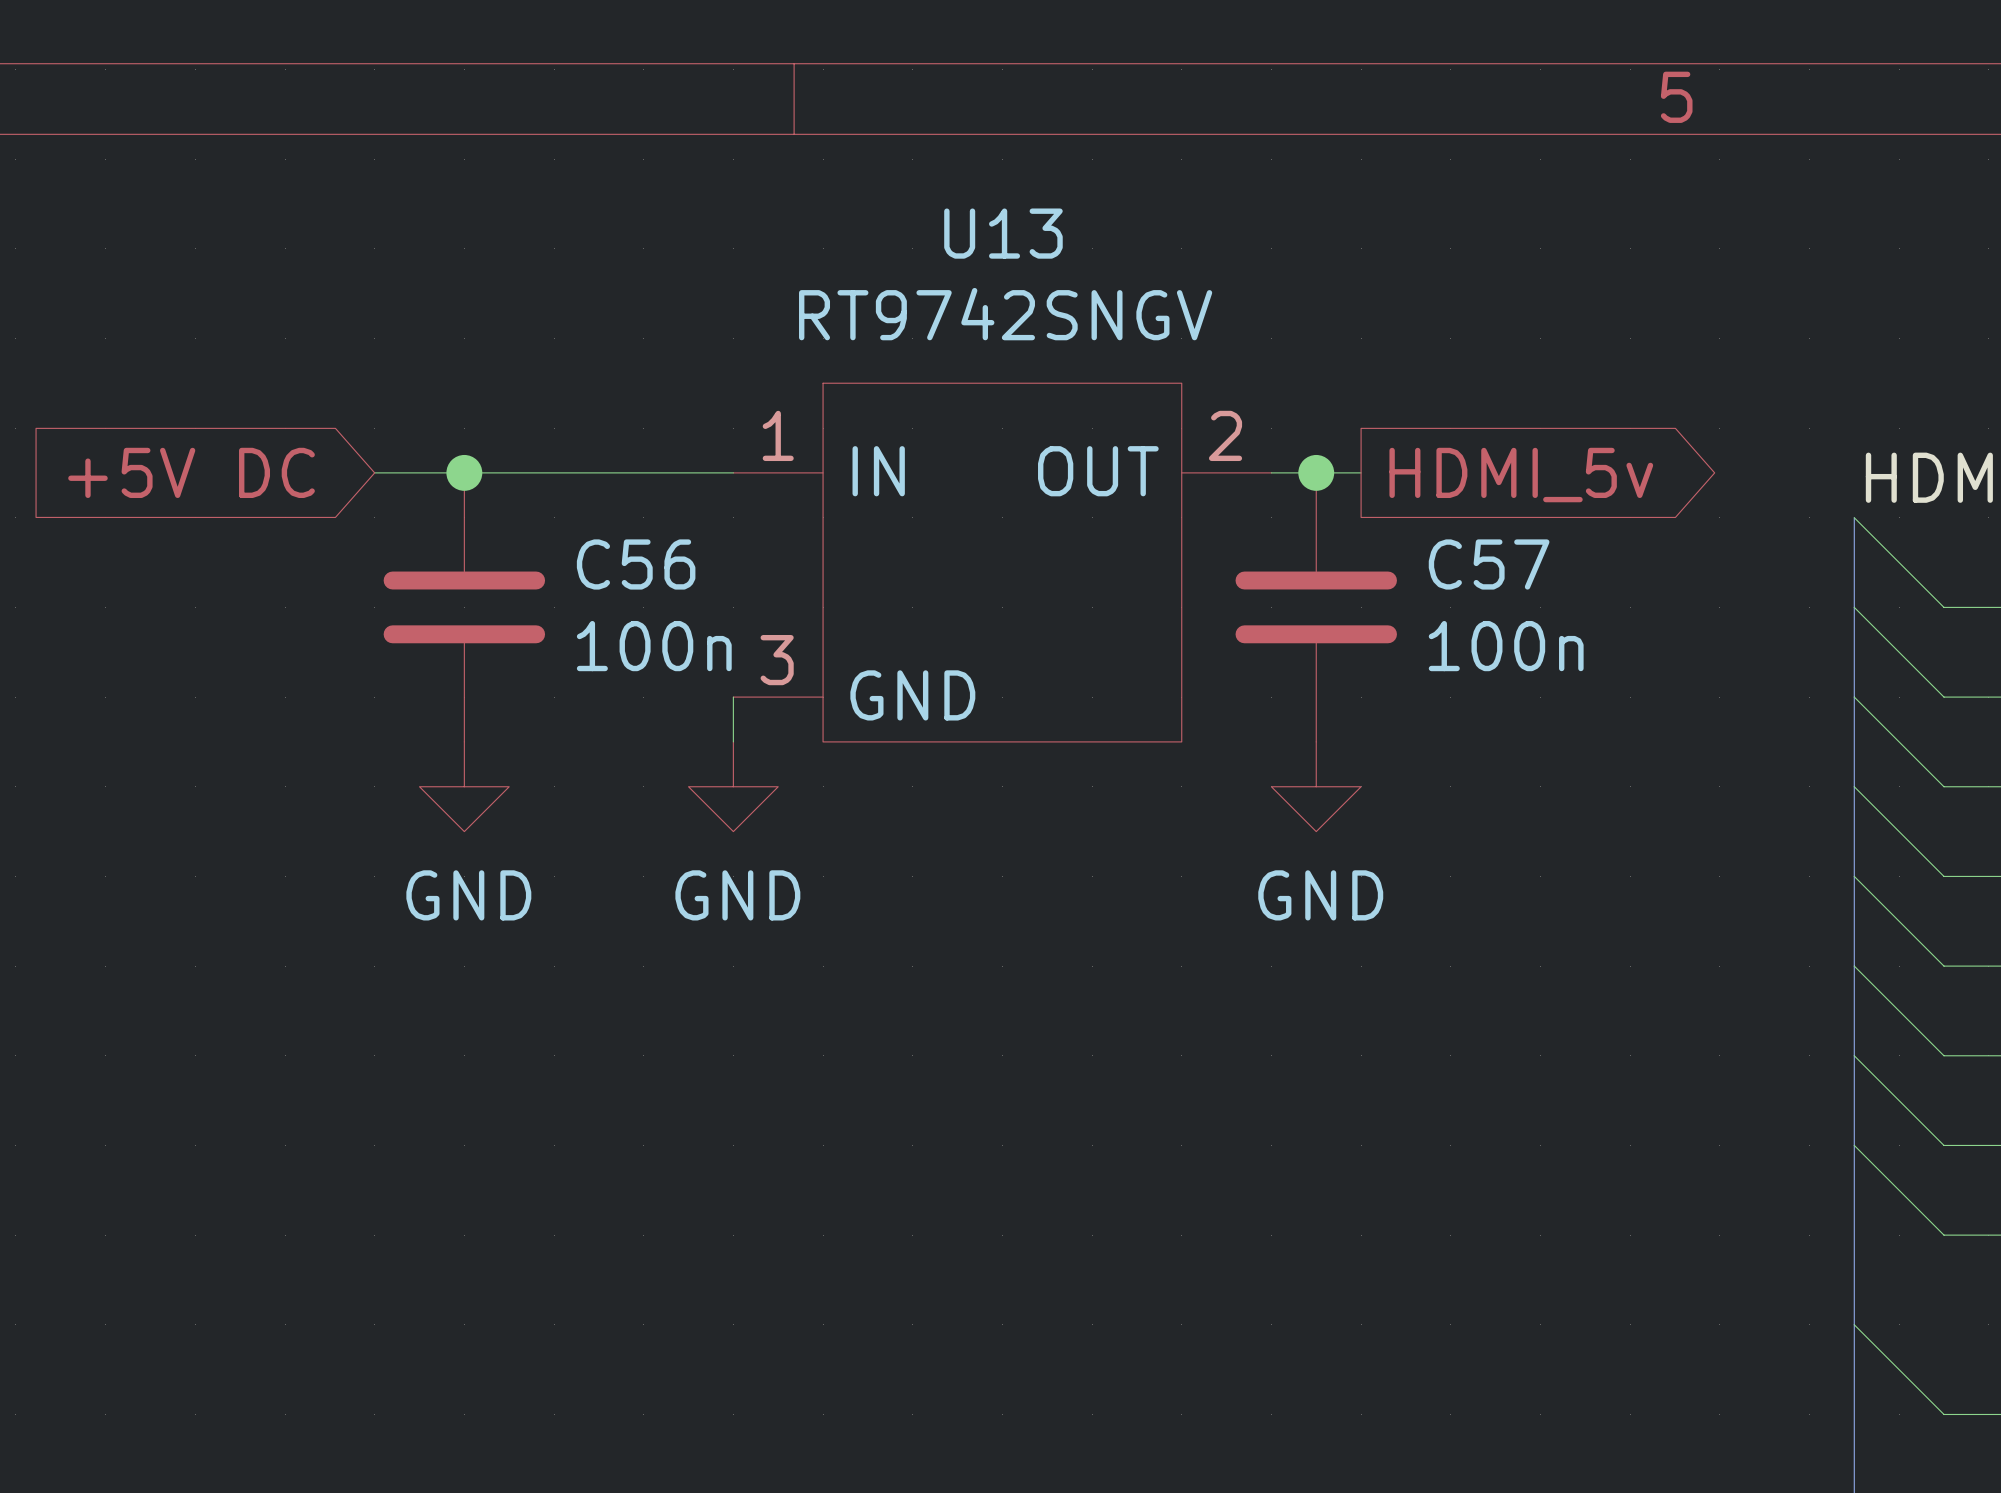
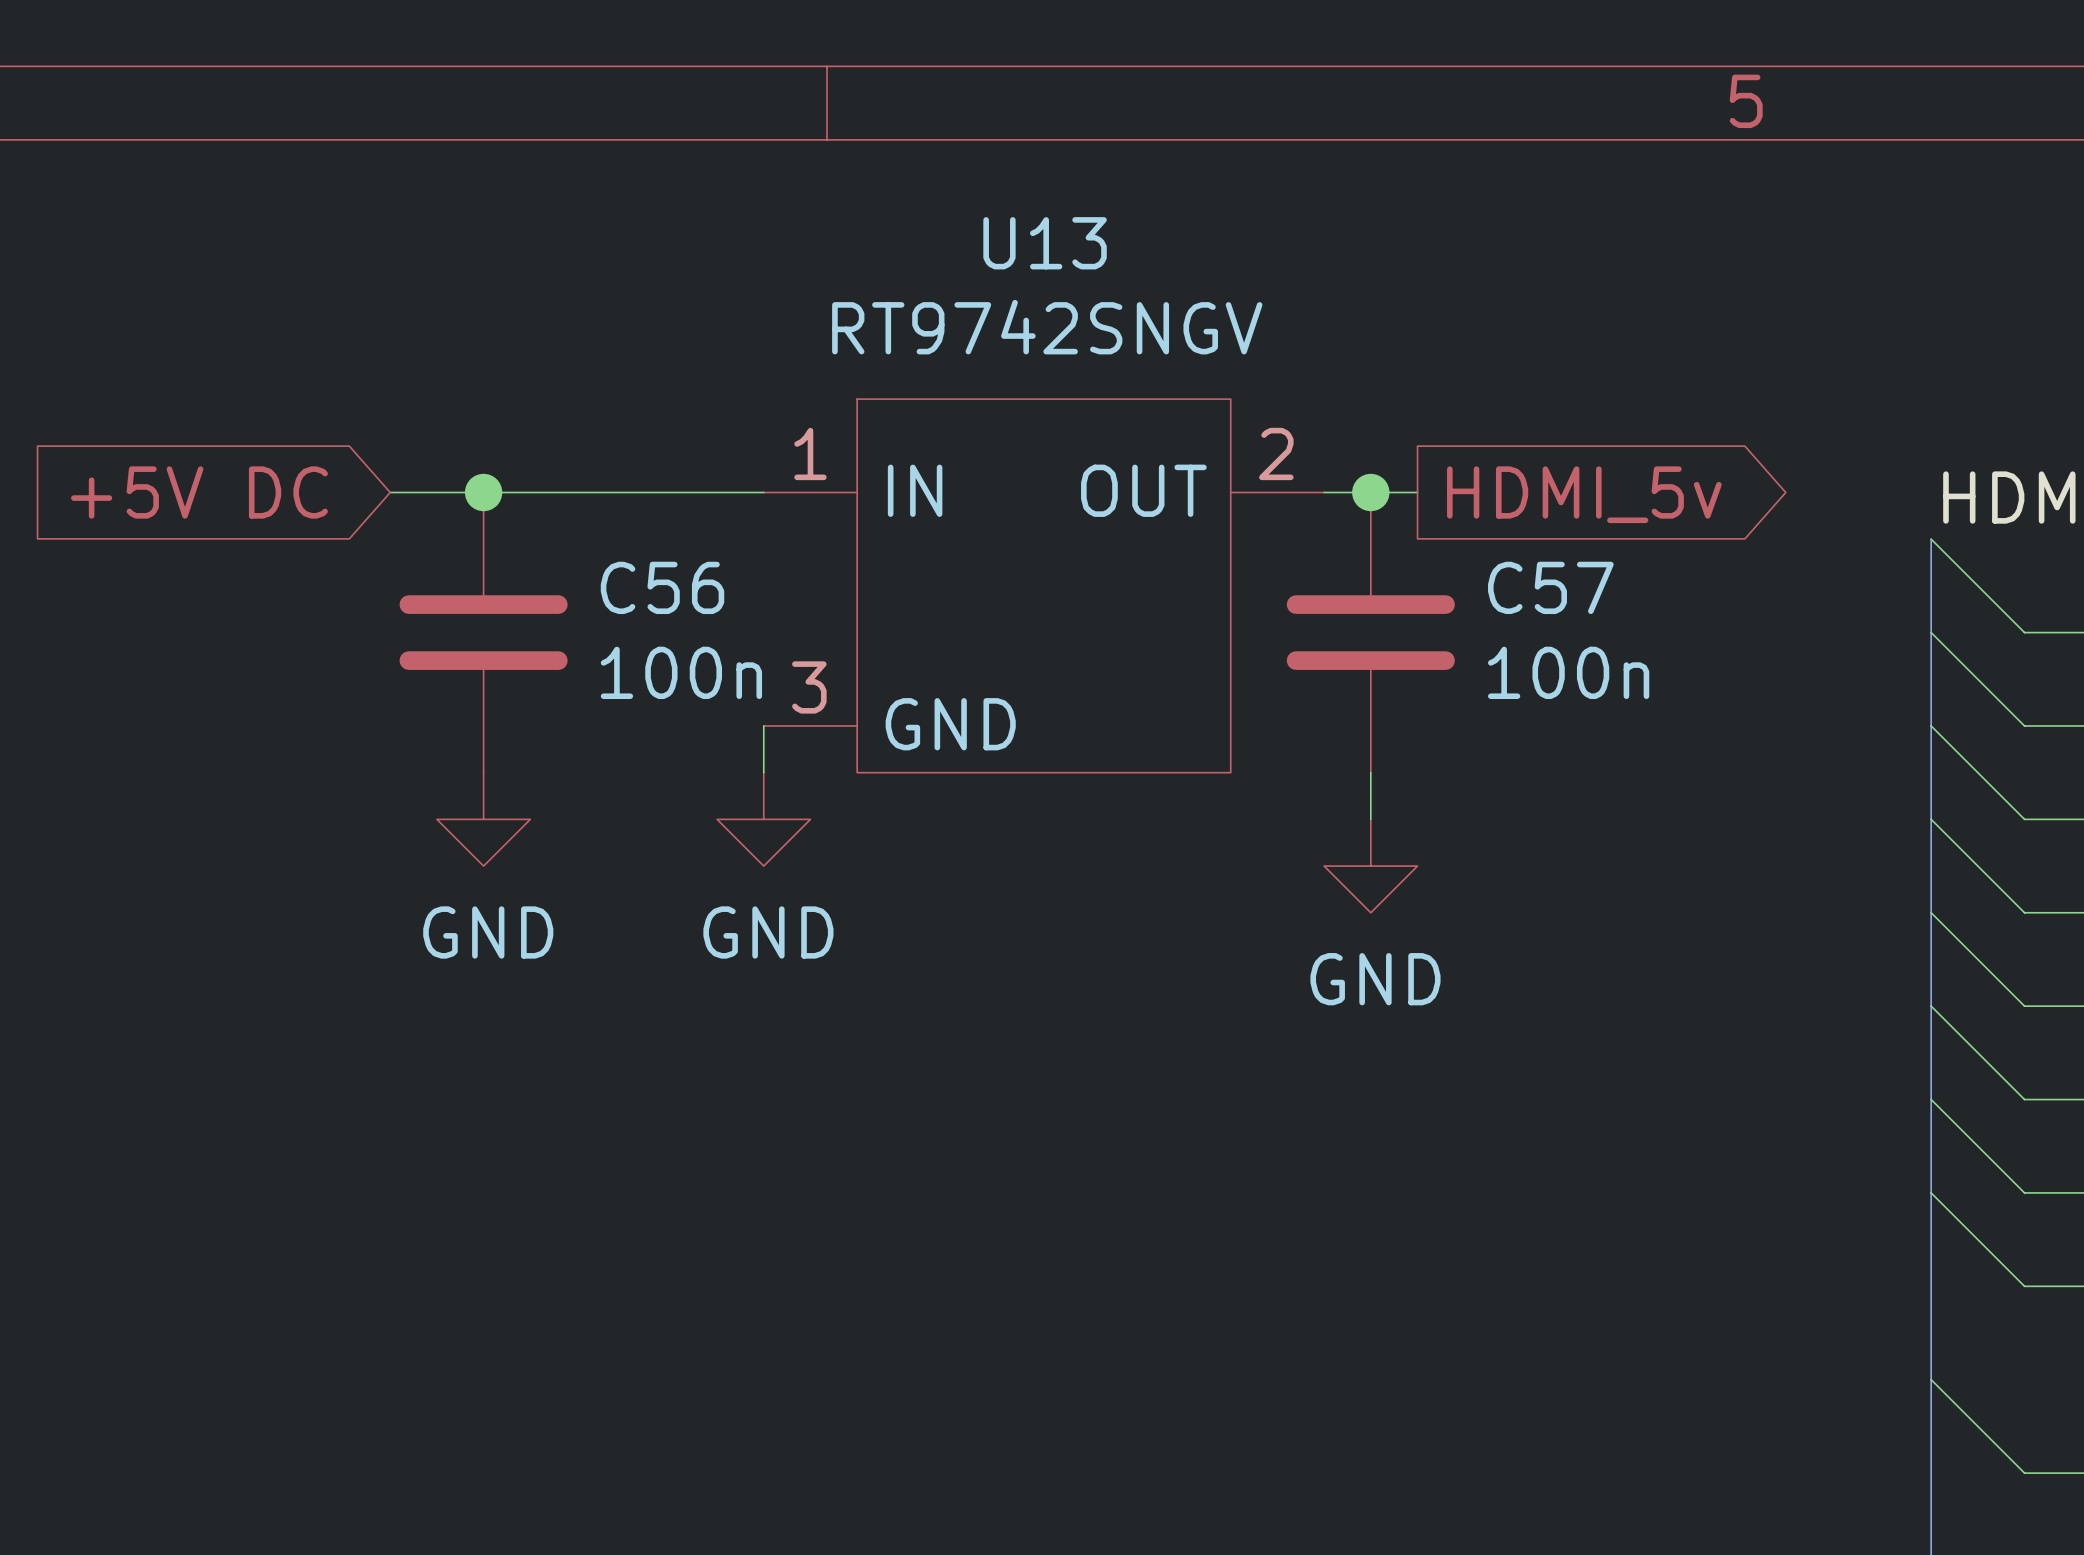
power symbol position: GND (1316, 786) -> GND (1370, 866)

